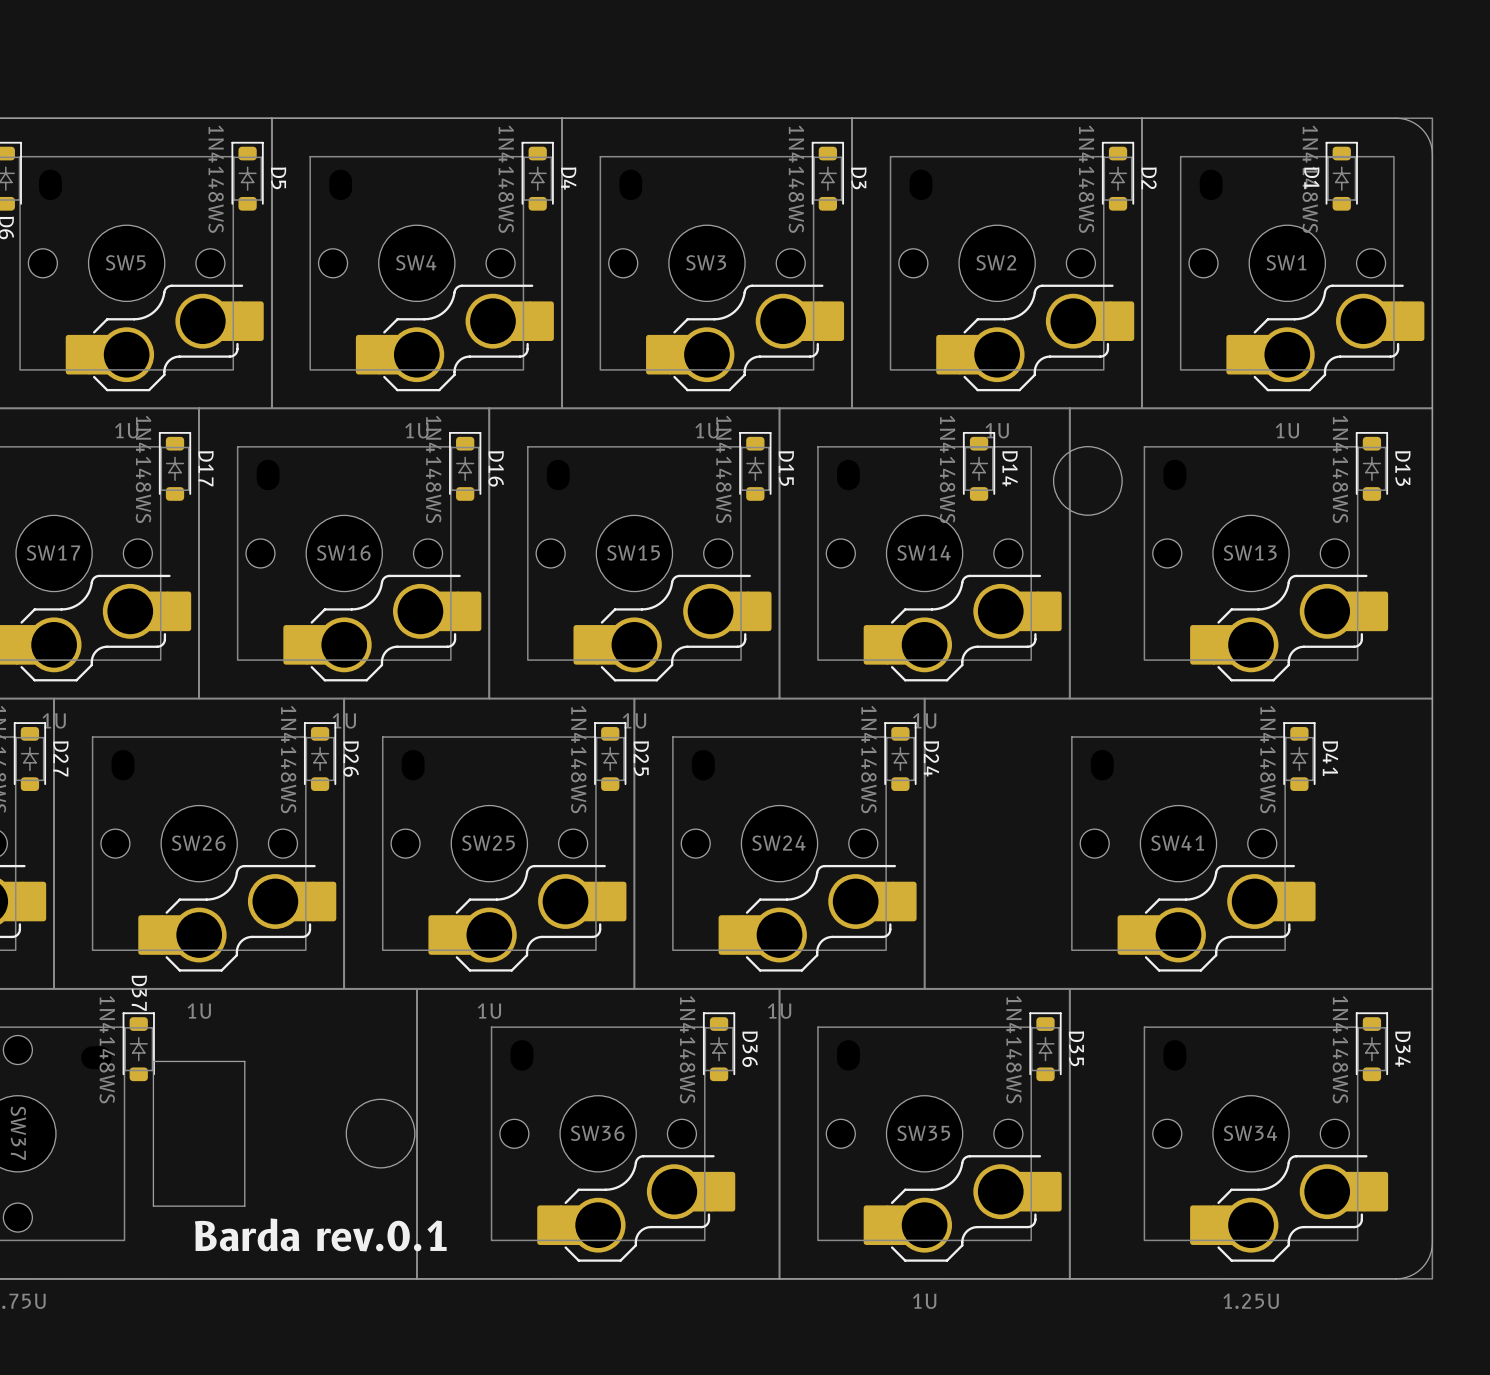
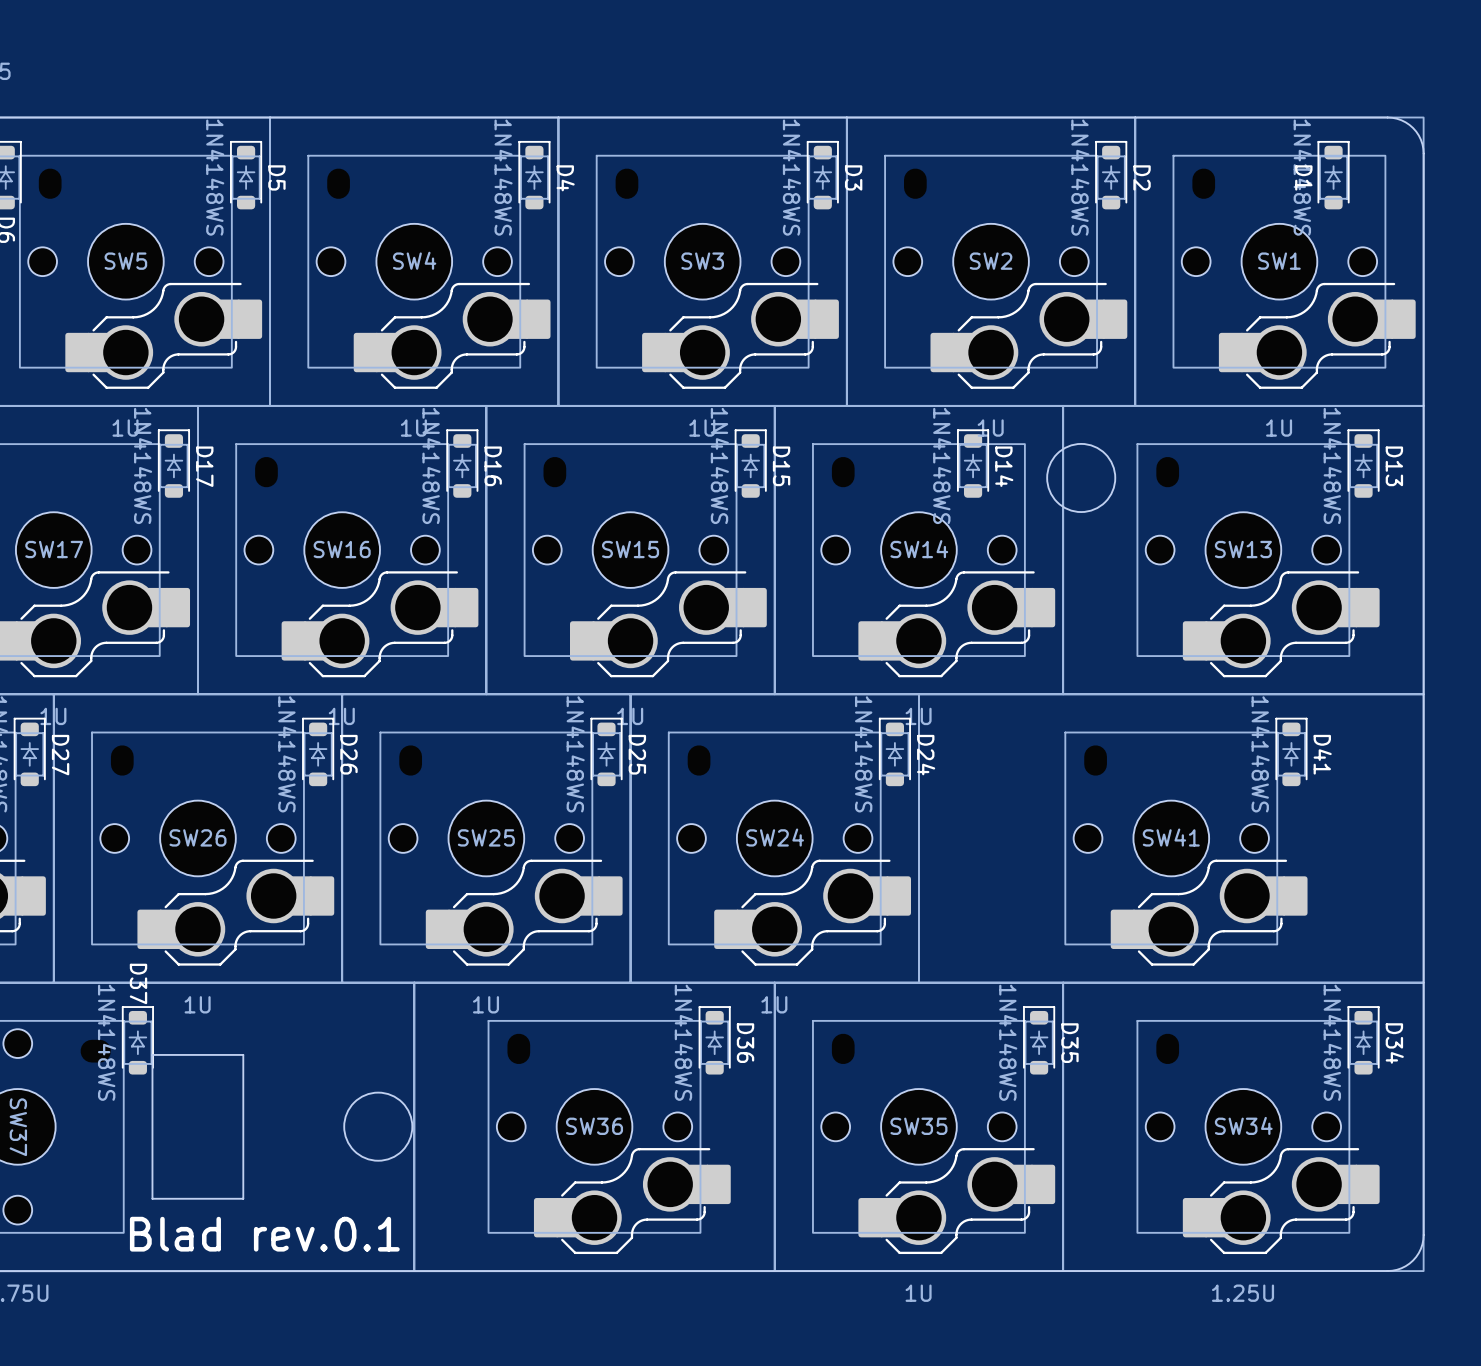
text: Barda rev.0.1 (320, 1234) -> Blad rev.0.1 (264, 1234)

